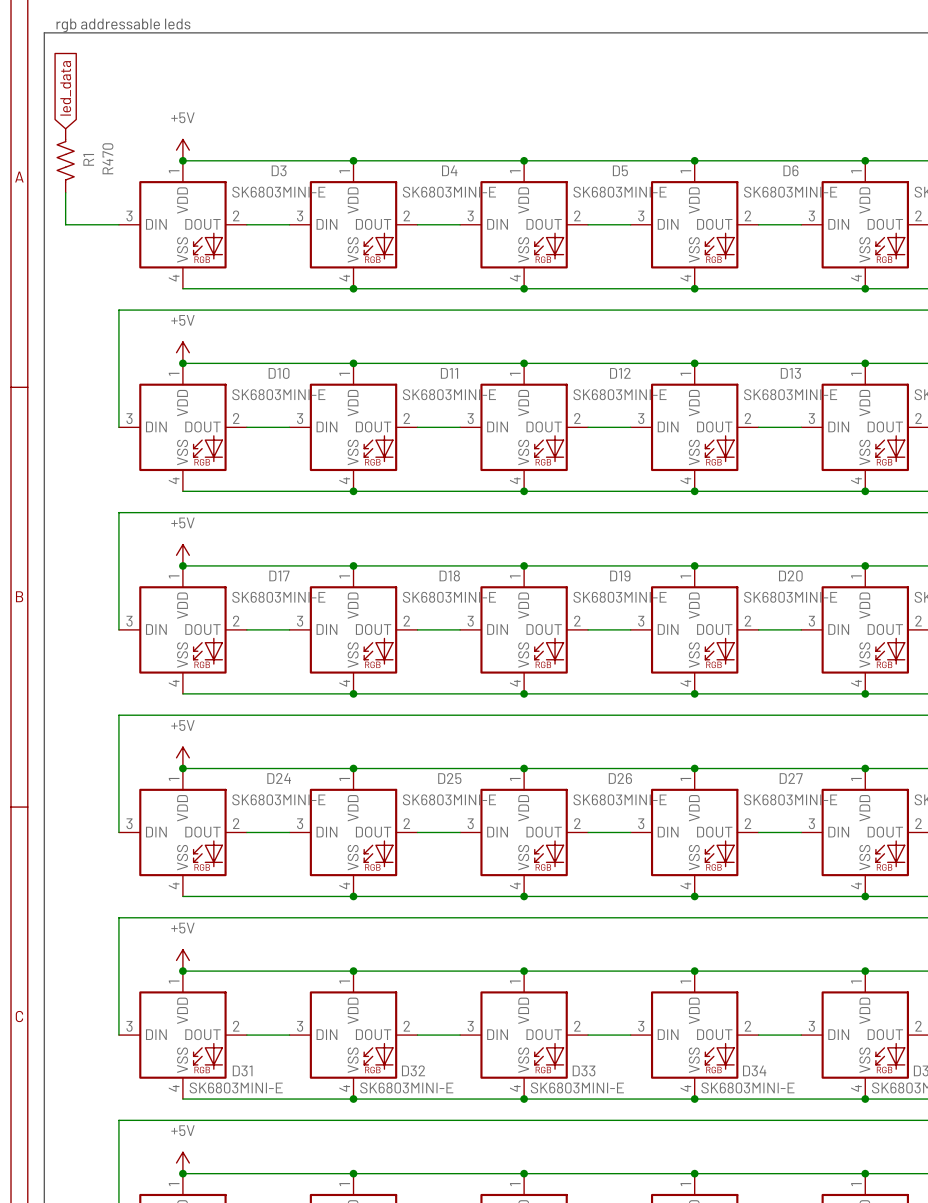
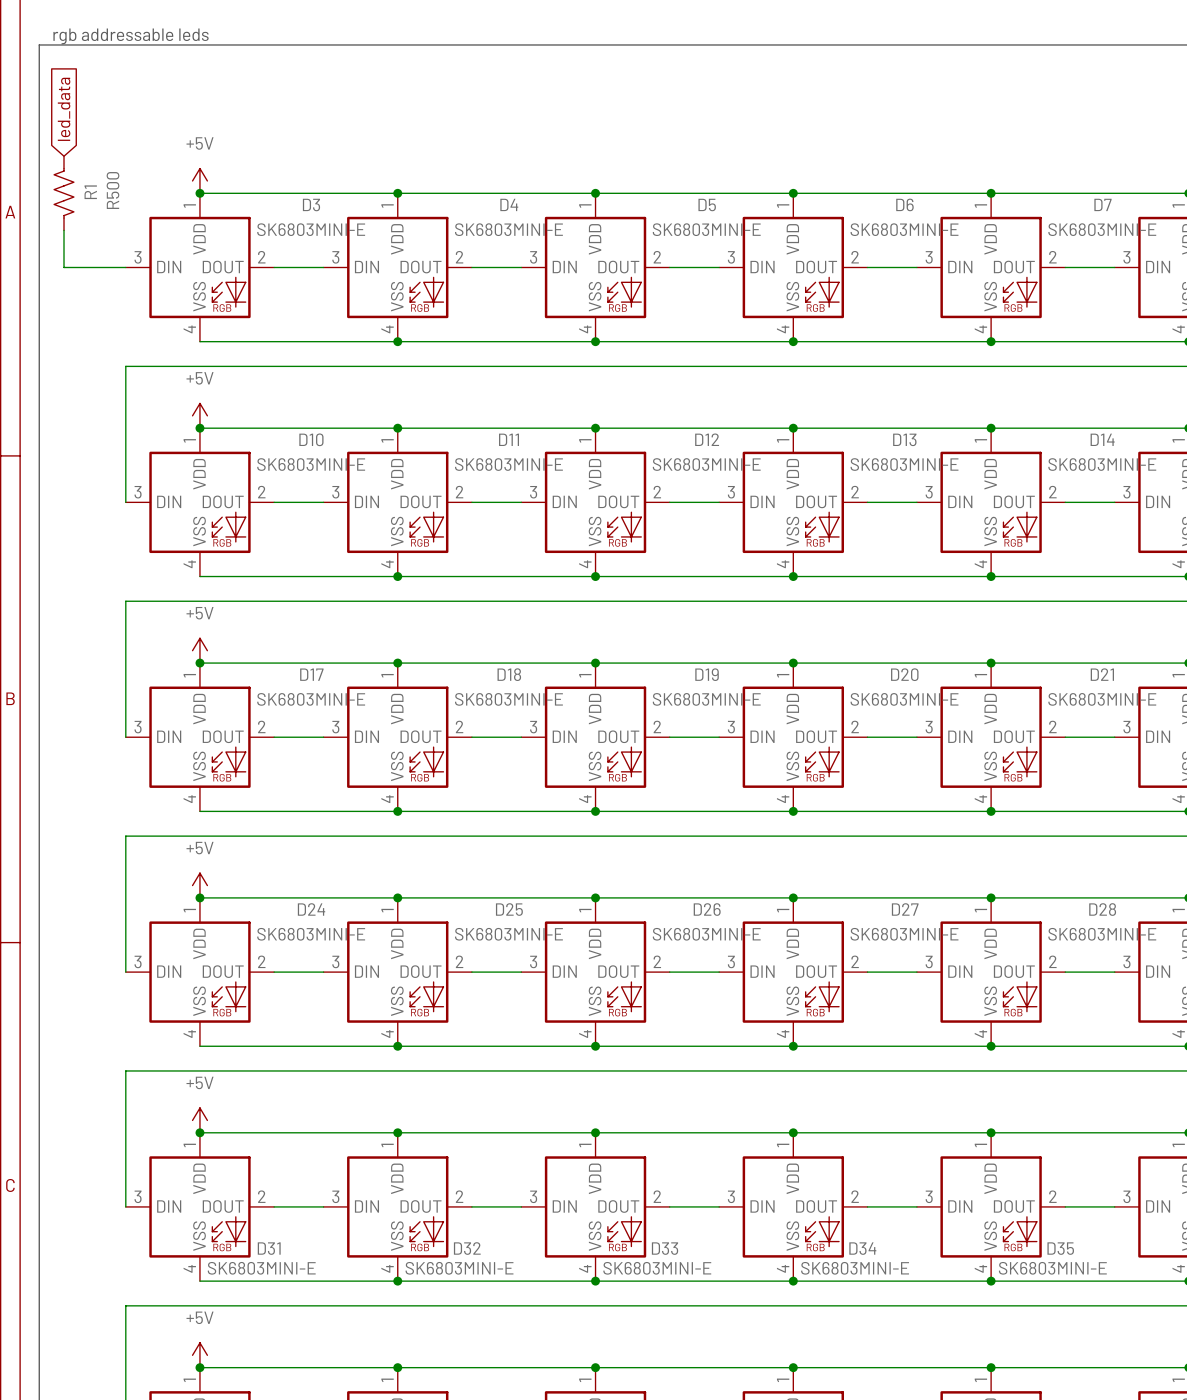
R1 value: R470 (107, 158) -> R500 (112, 190)

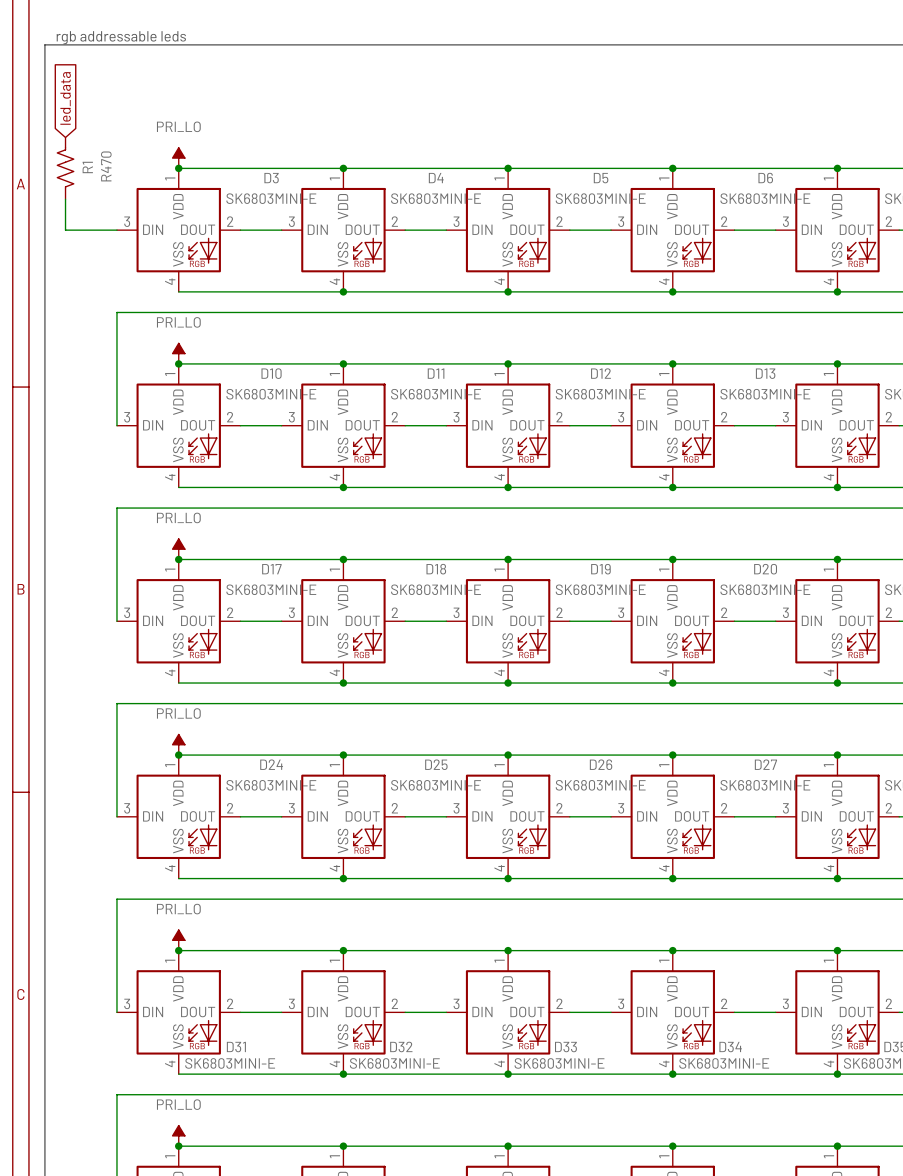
power symbol: +5V (199, 180) -> PRI_LO (178, 158)
R1 value: R500 (112, 190) -> R470 (106, 166)
power symbol: +5V (199, 415) -> PRI_LO (178, 353)
power symbol: +5V (199, 650) -> PRI_LO (178, 549)
power symbol: +5V (199, 885) -> PRI_LO (178, 744)
power symbol: +5V (199, 1120) -> PRI_LO (178, 940)
power symbol: +5V (199, 1355) -> PRI_LO (178, 1135)

